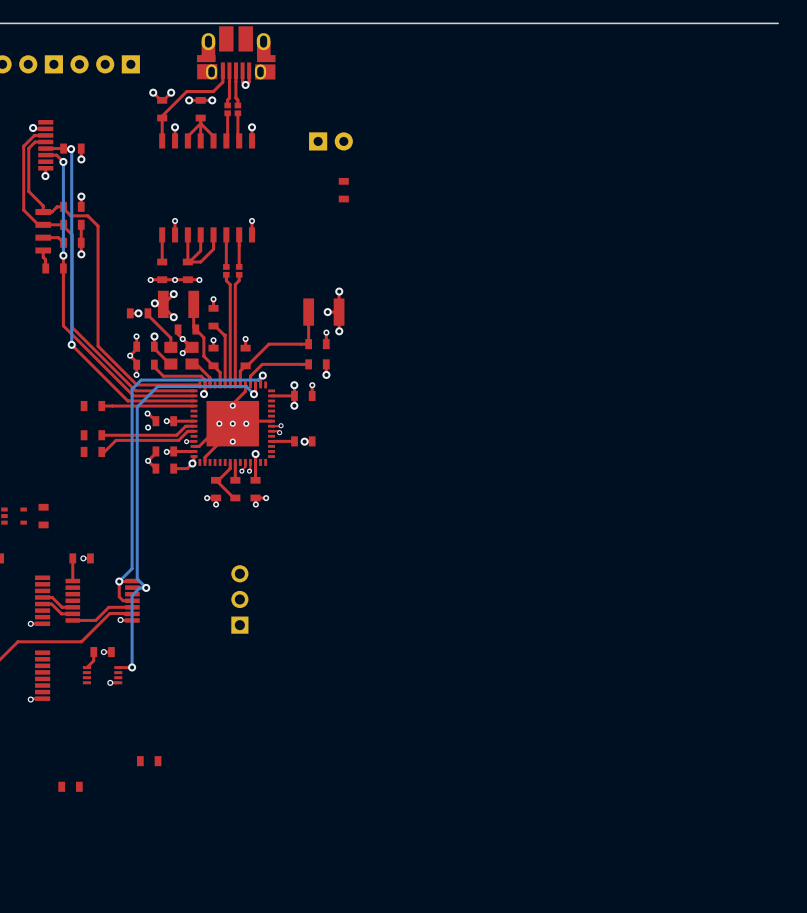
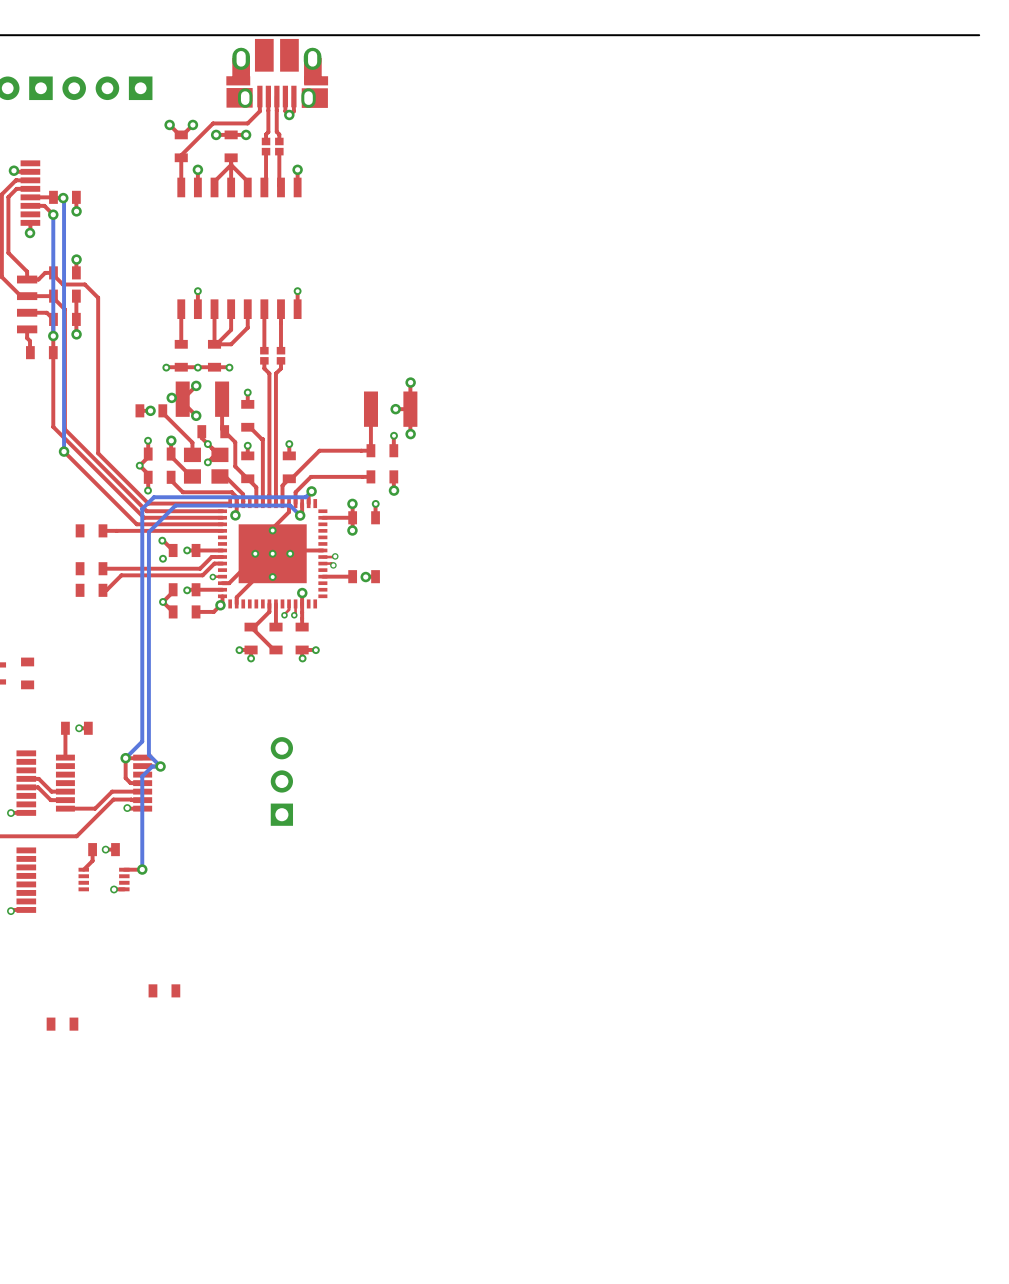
part: (330, 141) -> none
part: (343, 190) -> none

